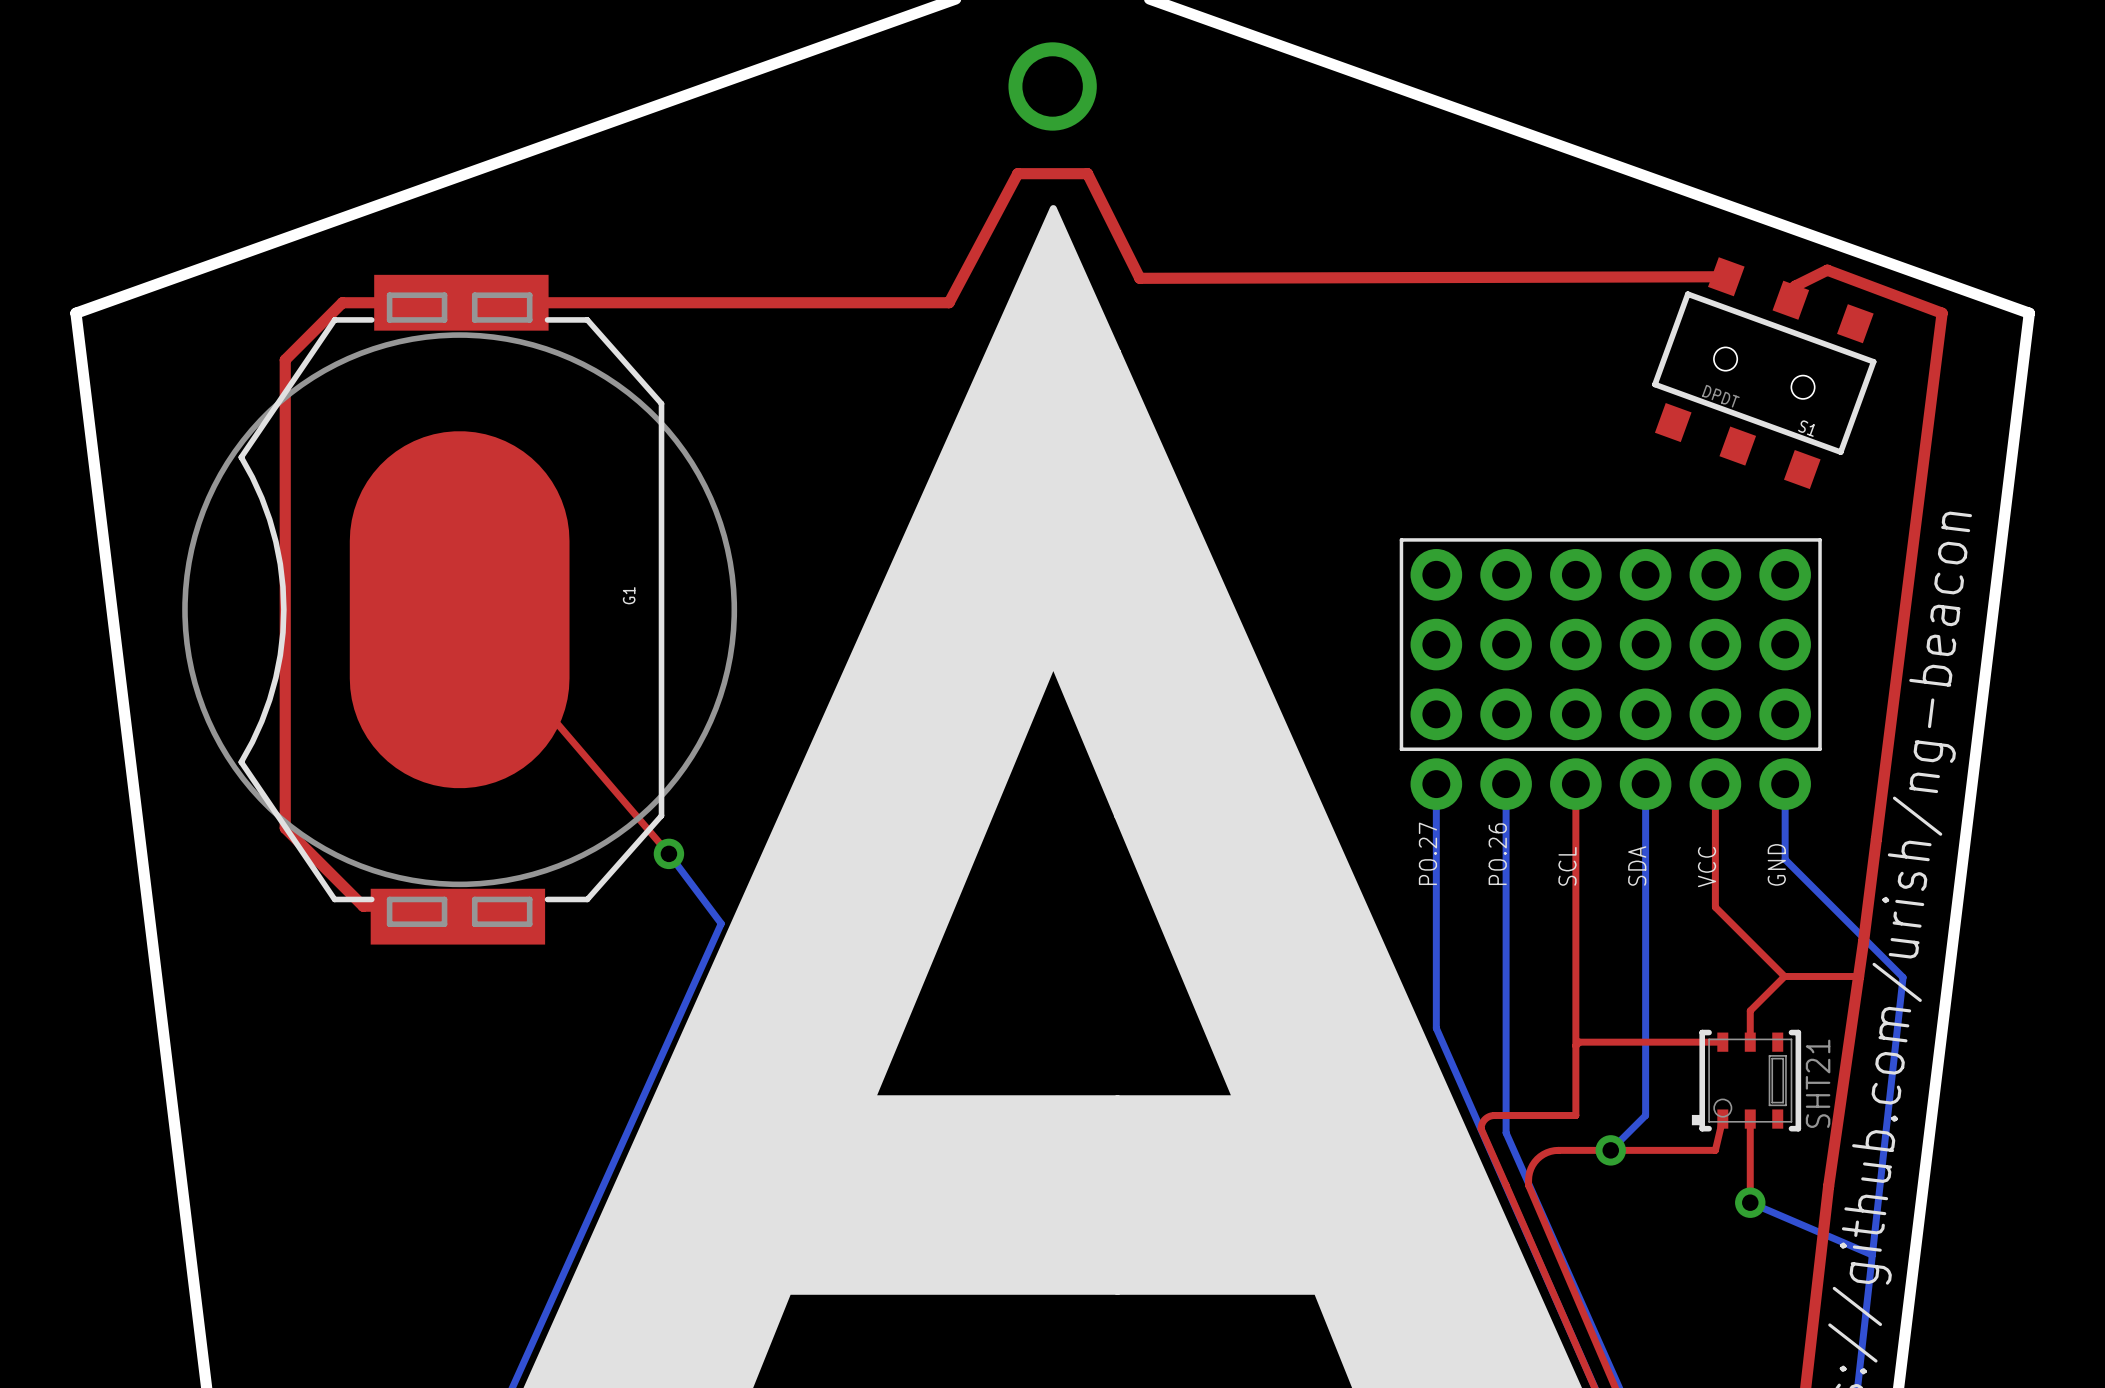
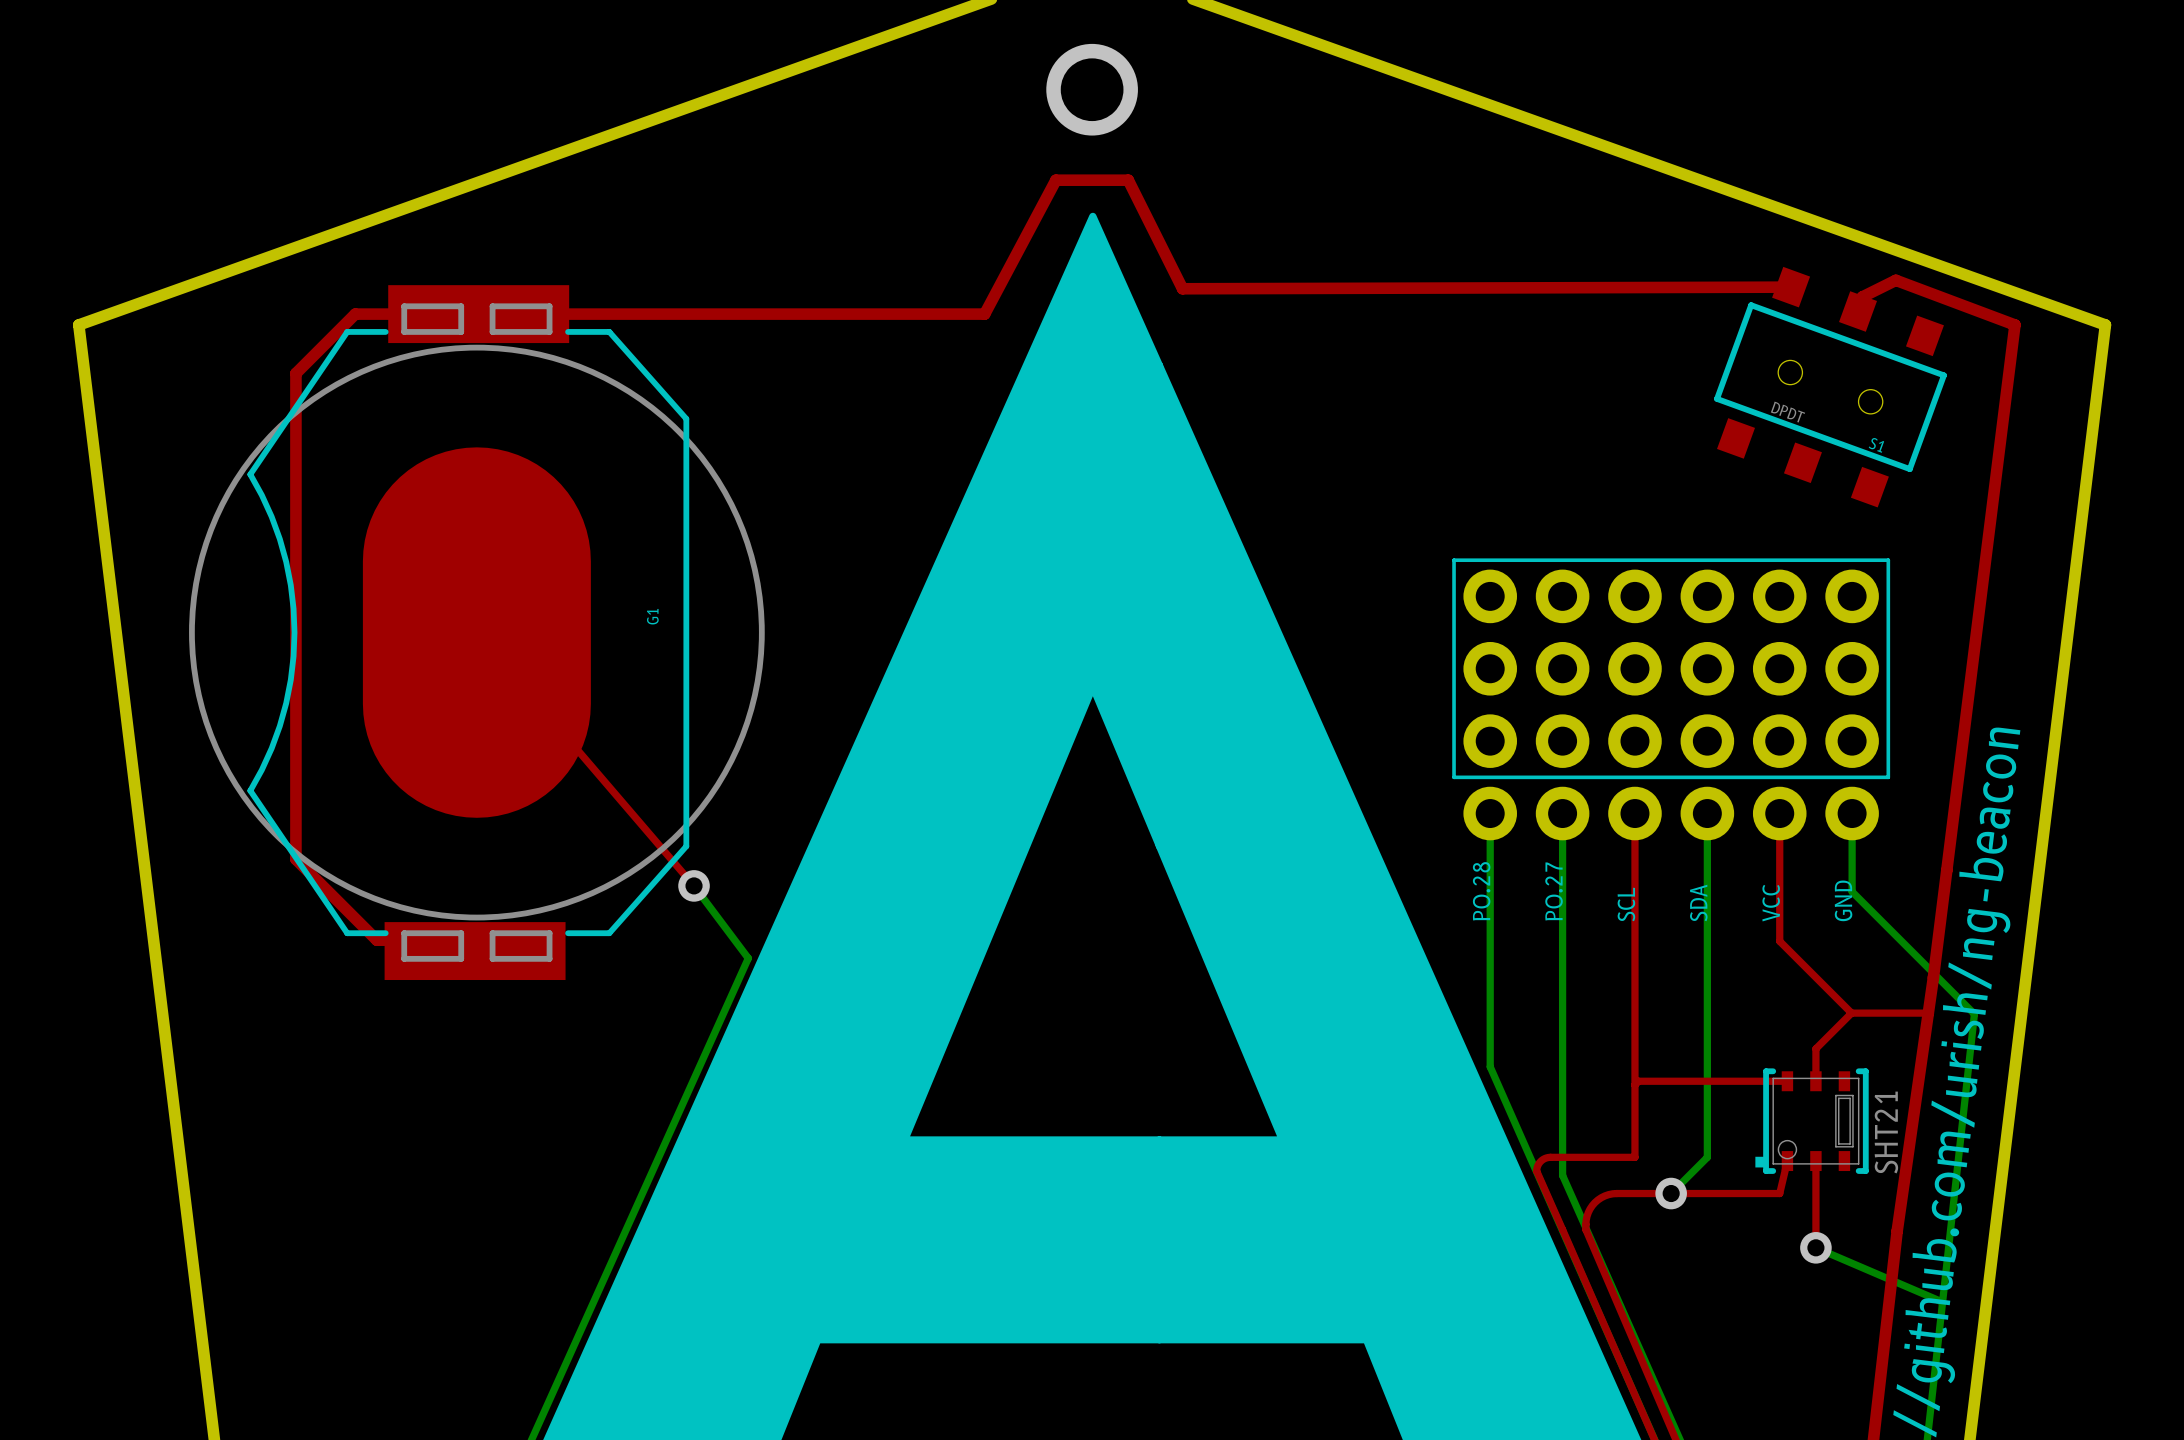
text: PO.27 (1427, 853) -> PO.28 (1481, 891)
text: PO.26 (1497, 854) -> PO.27 (1554, 891)

